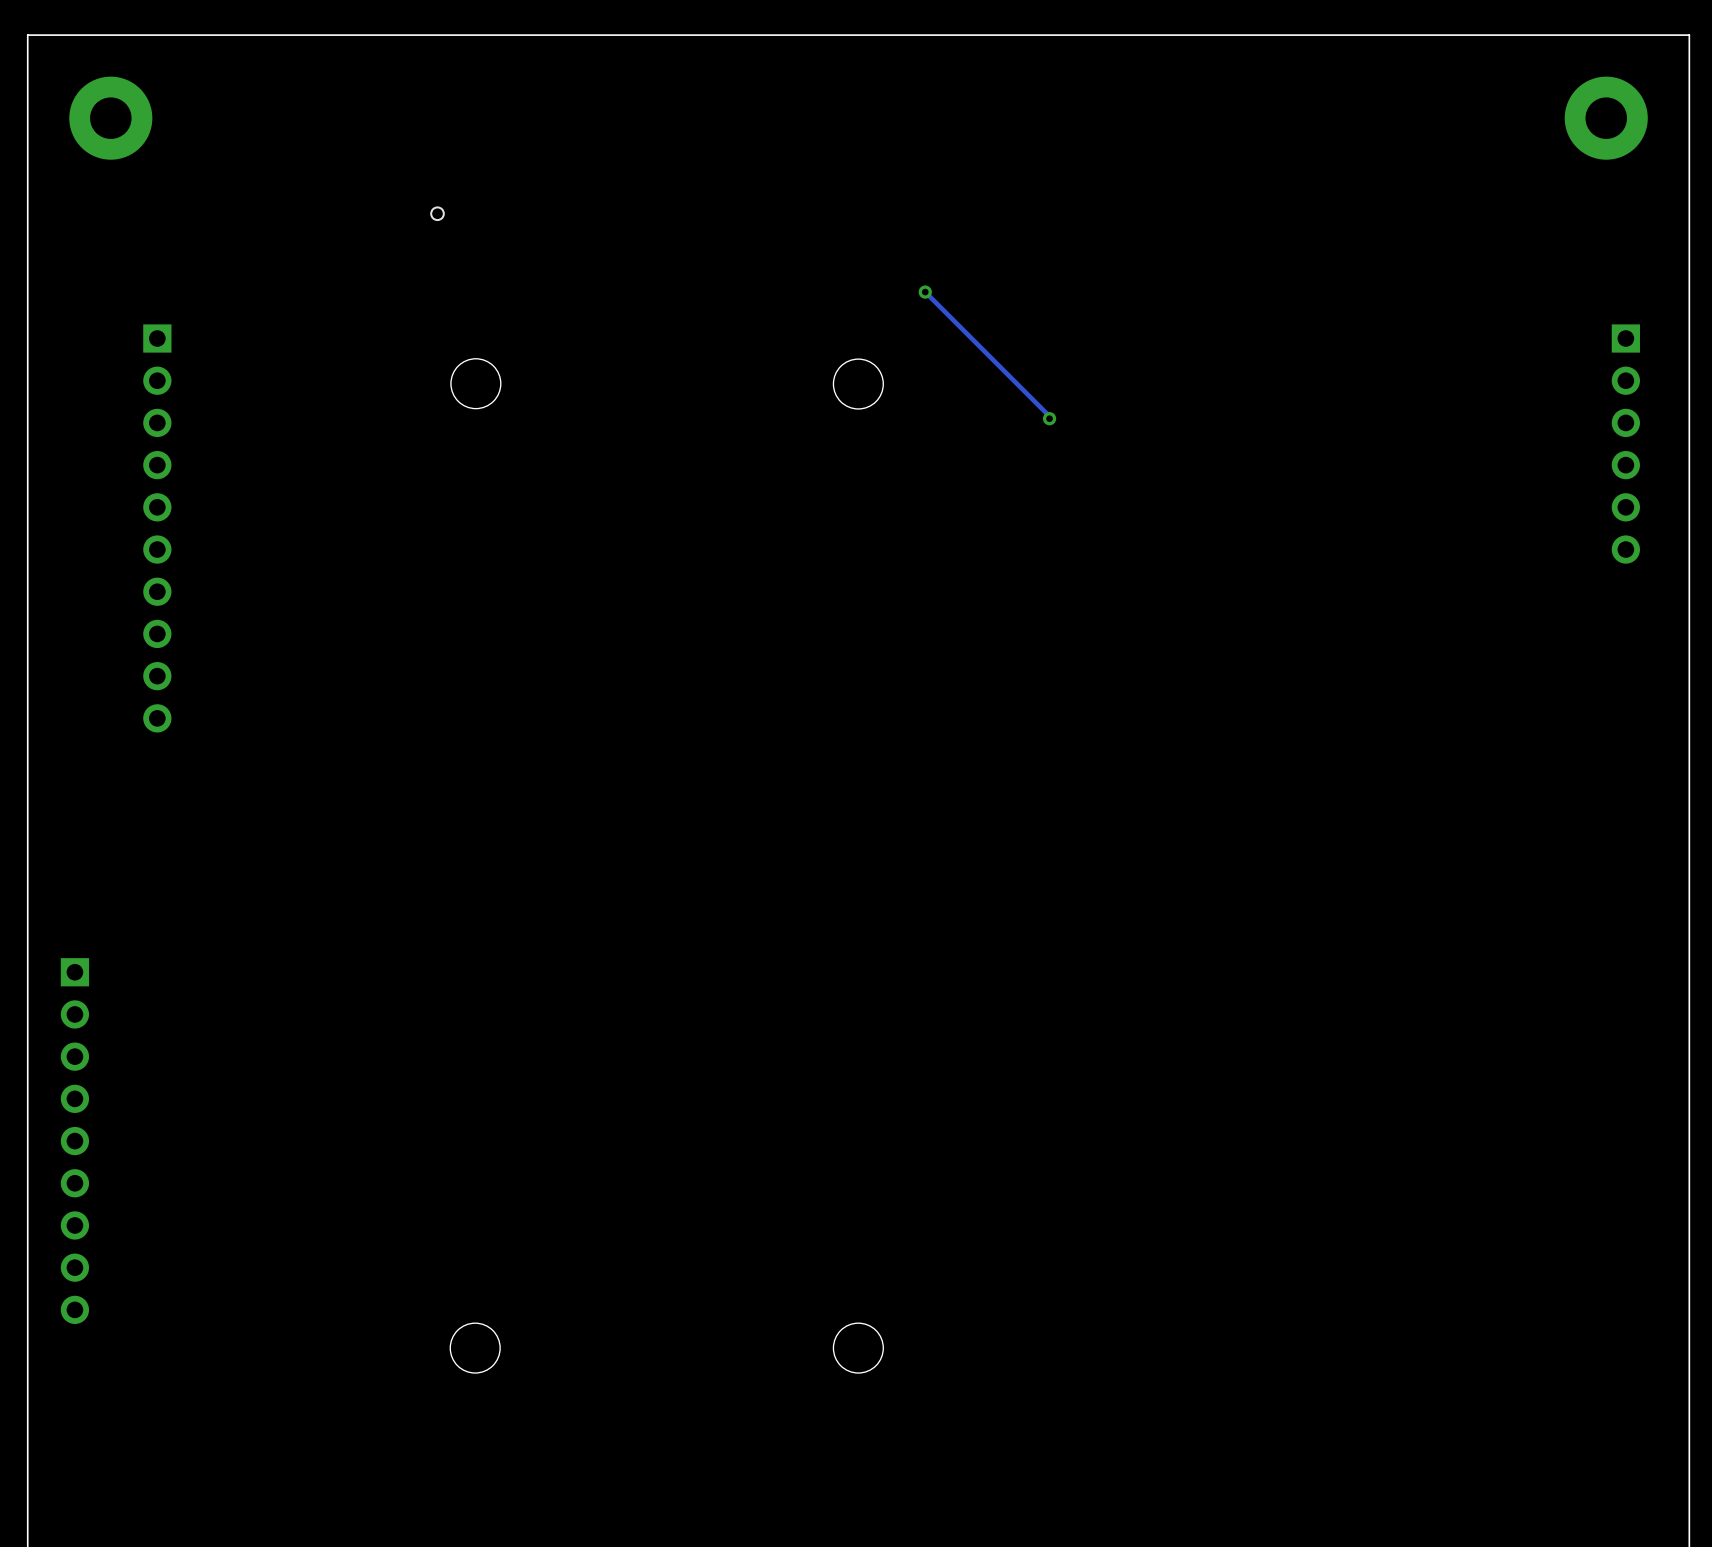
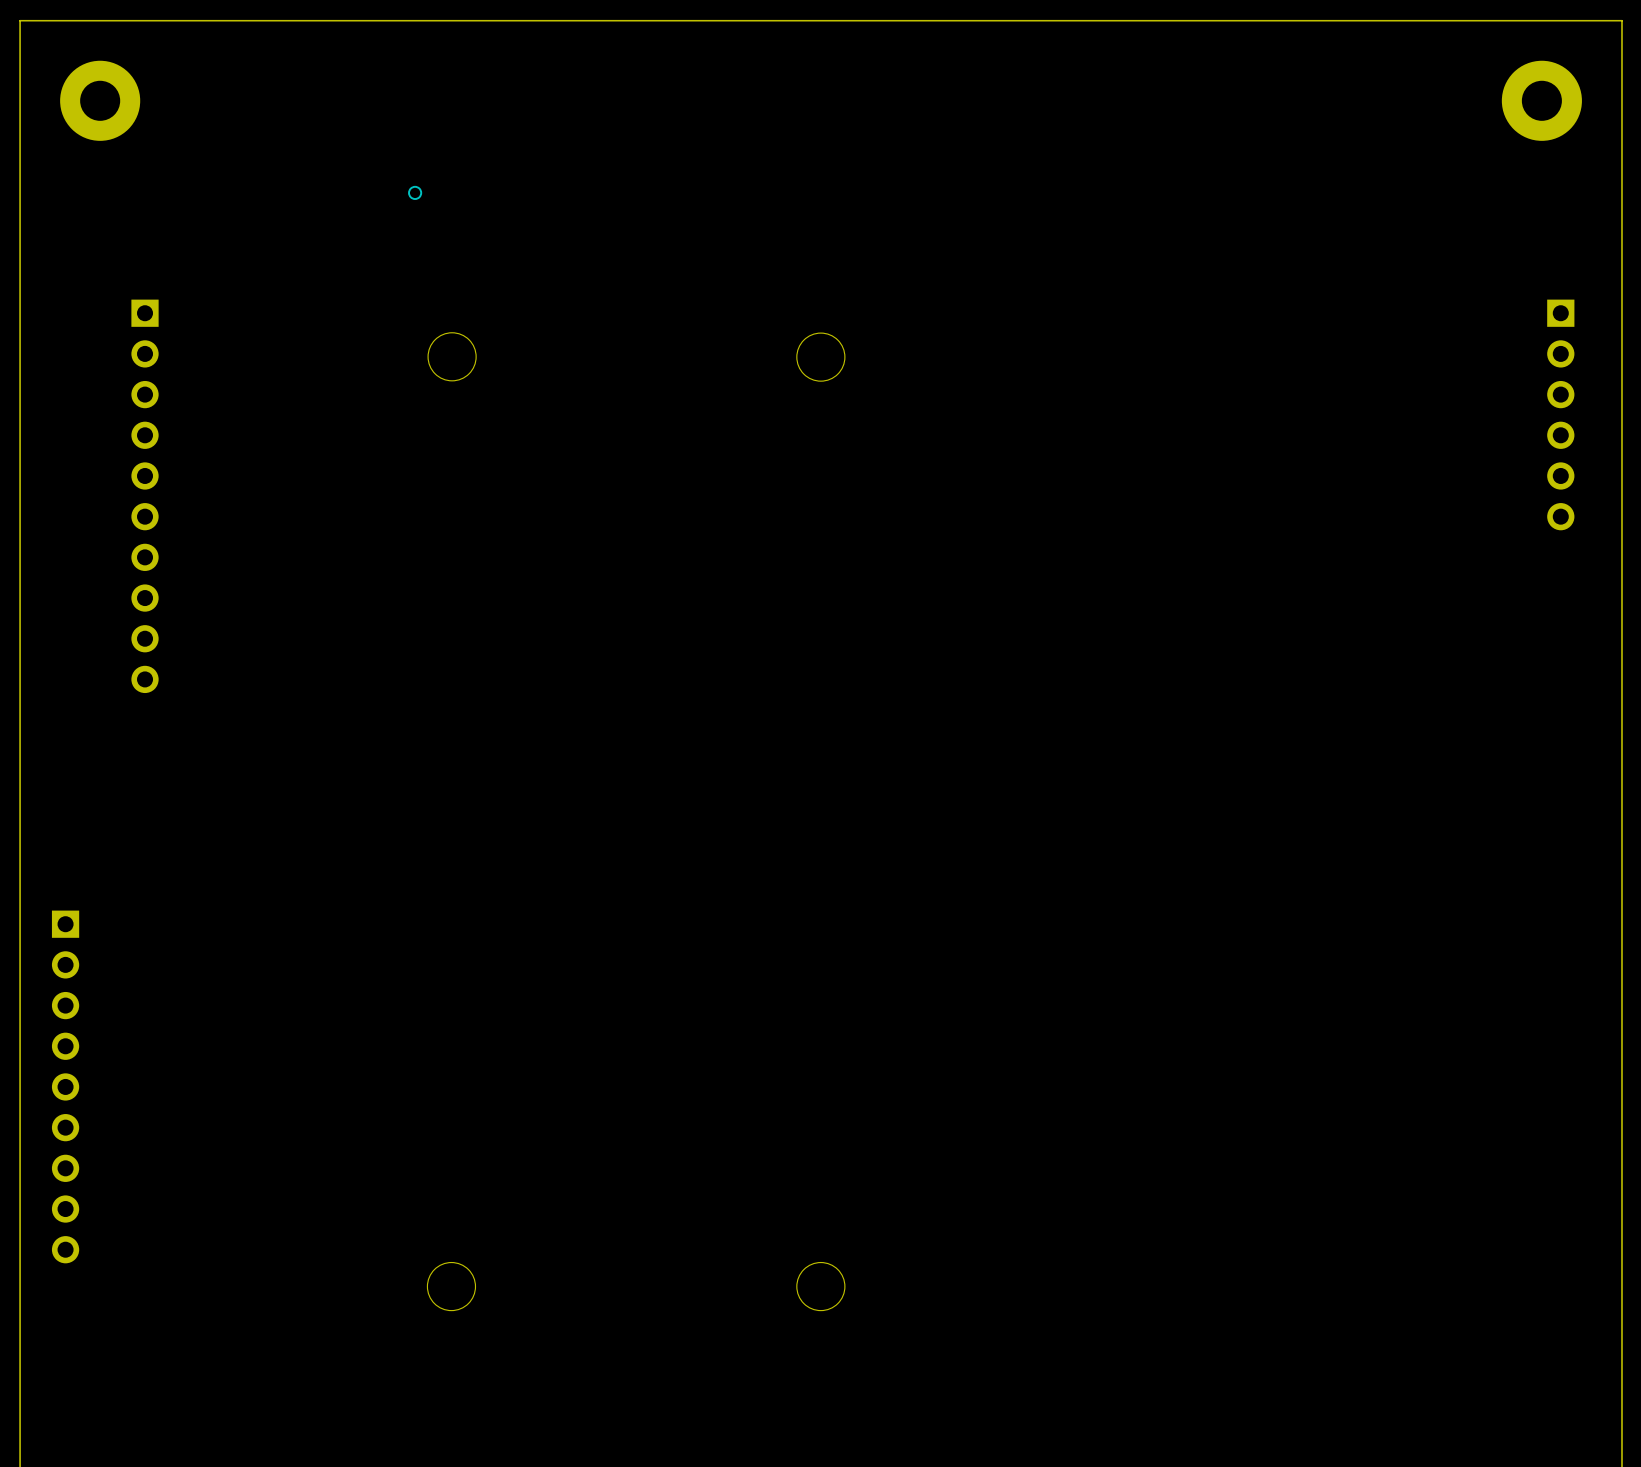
track: (925, 292) (1049, 416) (1049, 418) -> none
via: (925, 292) -> none
via: (1049, 418) -> none

